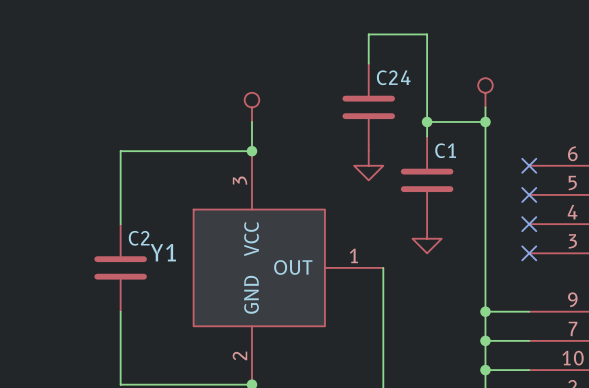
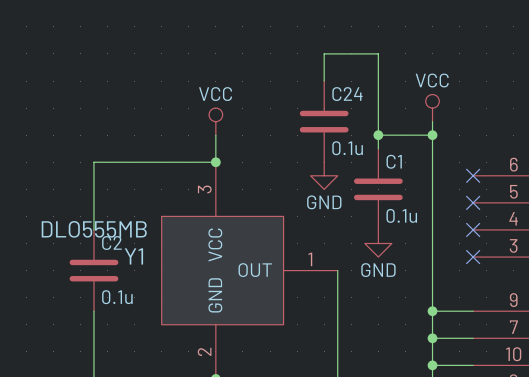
power symbol text: none -> VCC (432, 80)
power symbol text: none -> VCC (215, 94)
C24 value: none -> 0.1u (347, 148)
power symbol text: none -> GND (324, 202)
C1 value: none -> 0.1u (401, 215)
Y1 value: none -> DLO555MB (94, 229)
power symbol text: none -> GND (378, 270)
C2 value: none -> 0.1u (117, 297)

